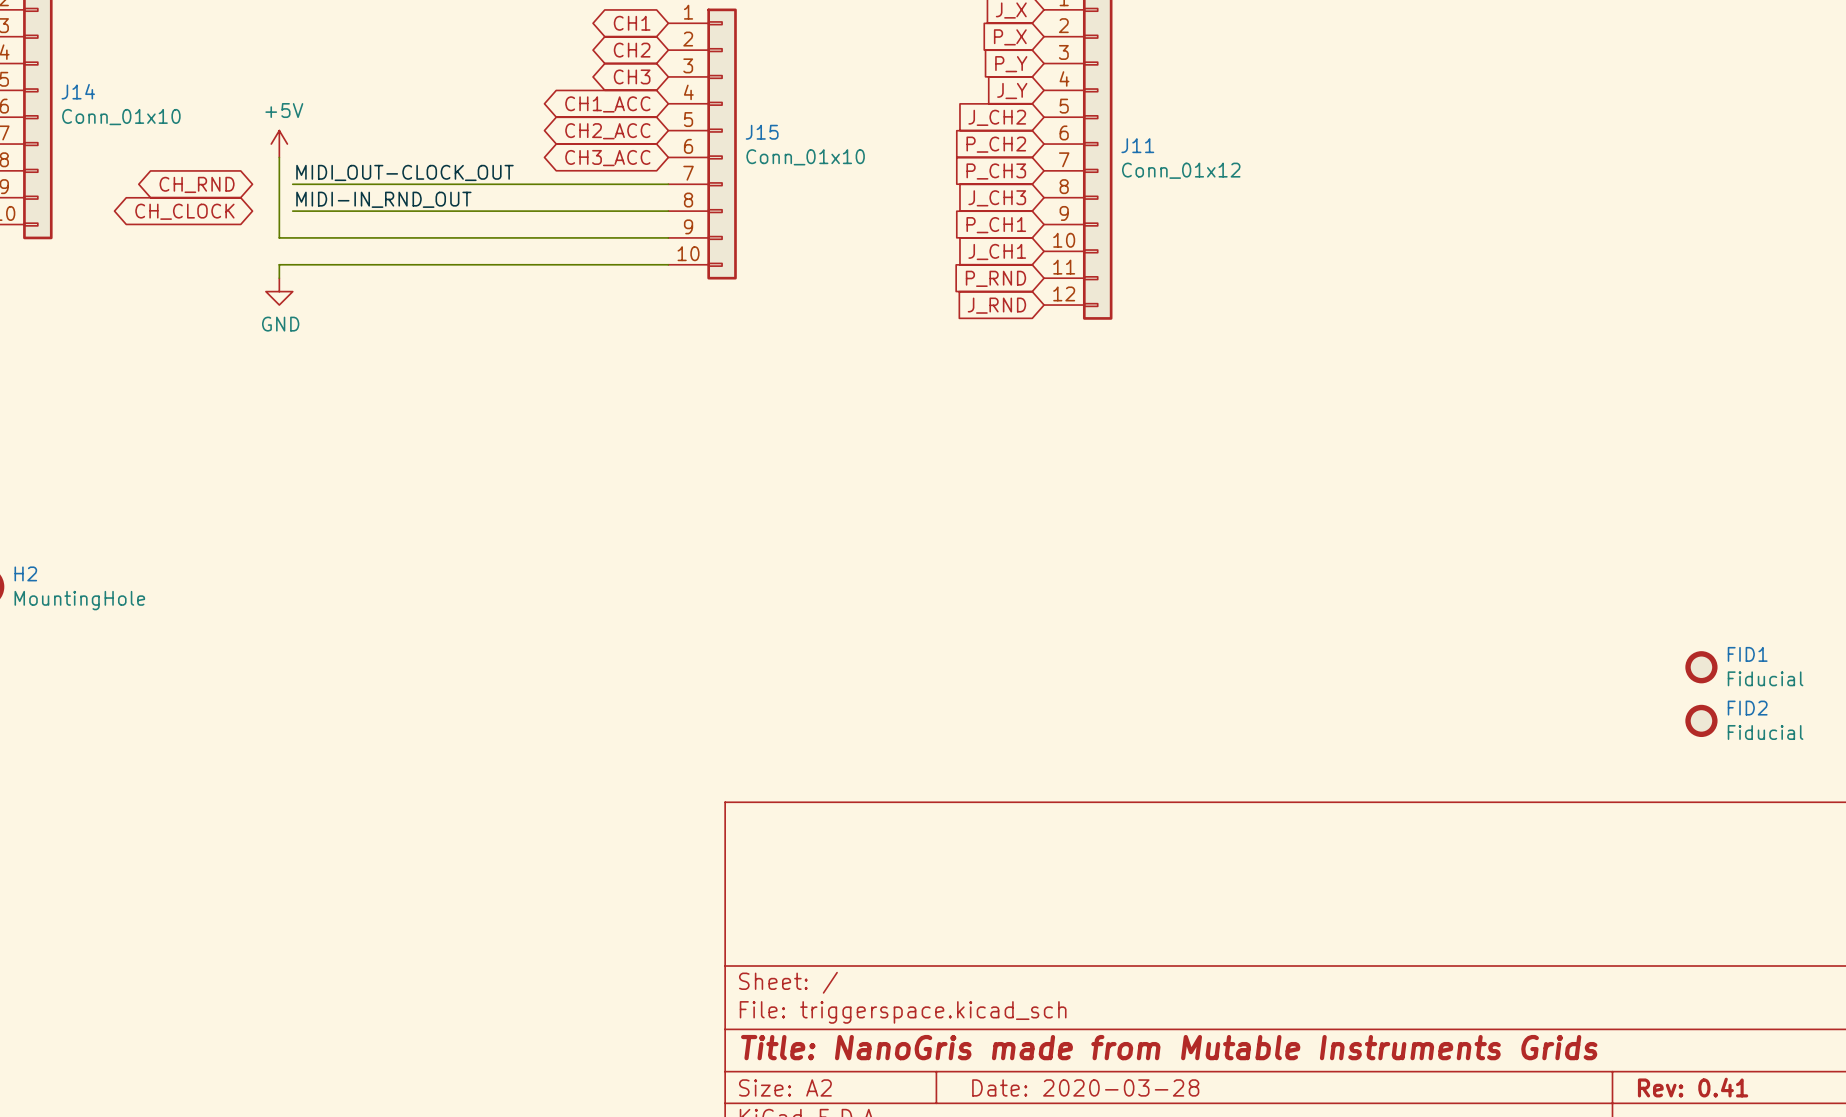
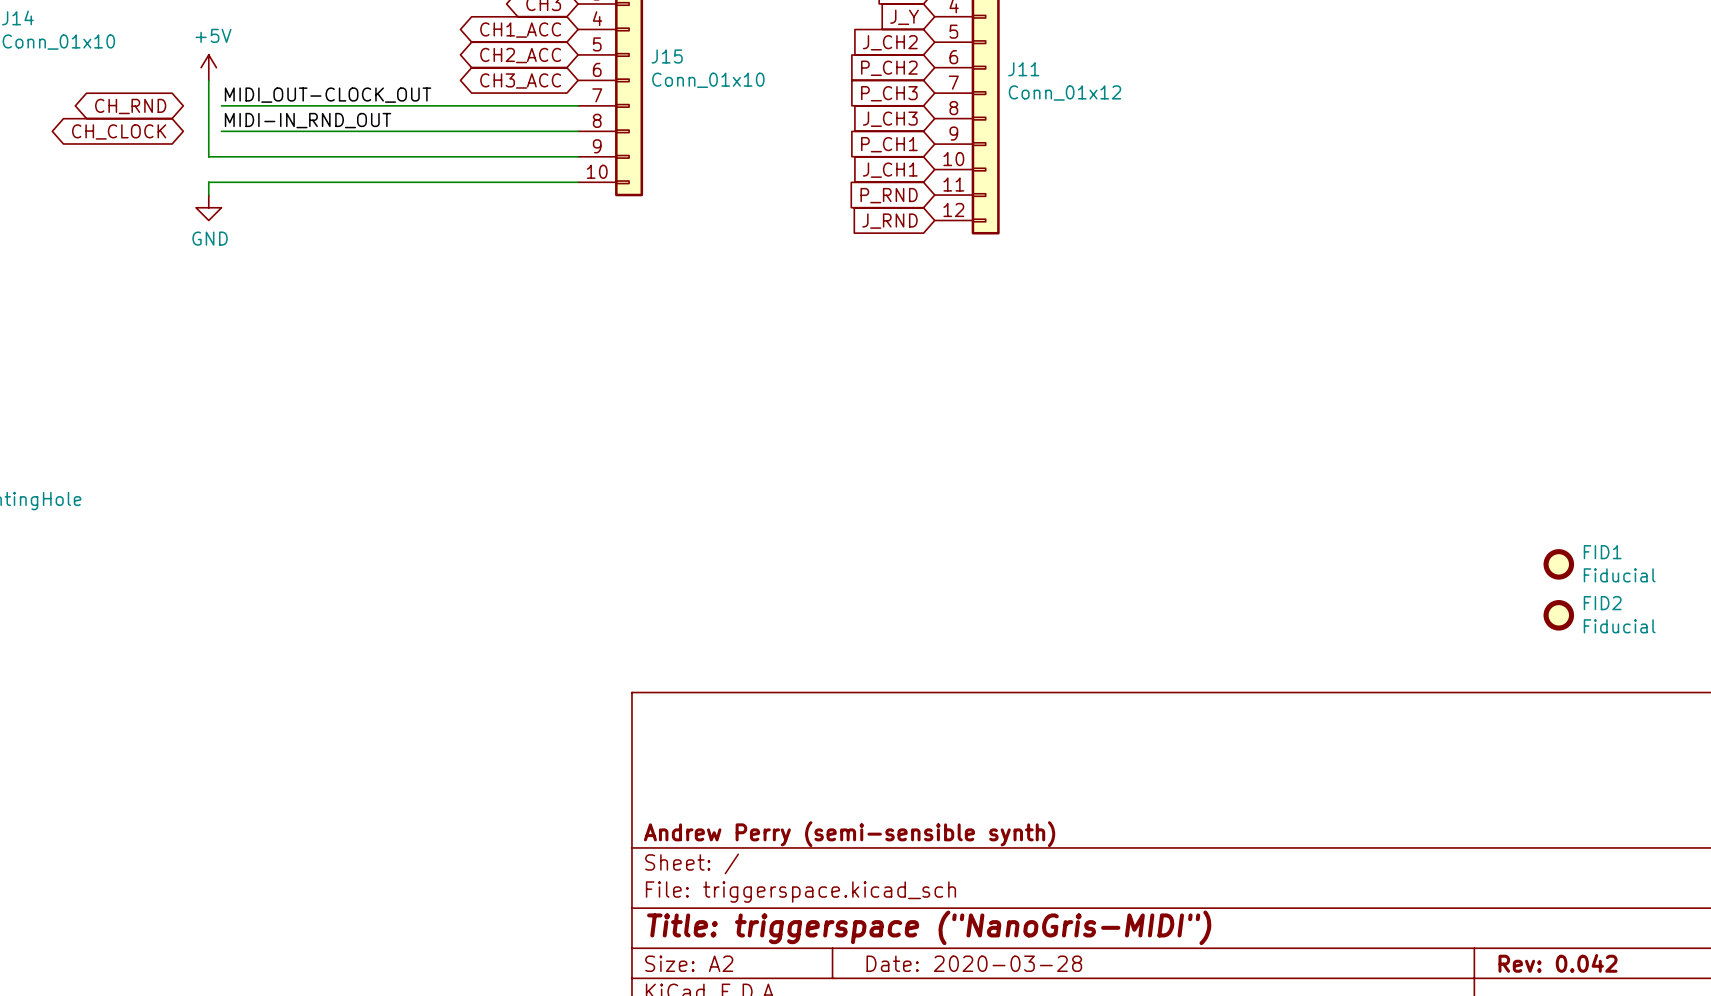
title block: none -> Andrew Perry (semi-sensible synth) (849, 834)
title block: Title: NanoGris made from Mutable Instruments Grids (1169, 1047) -> Title: triggerspace ("NanoGris-MIDI") (929, 927)
title block: Rev: 0.41 (1693, 1087) -> Rev: 0.042 (1558, 963)

